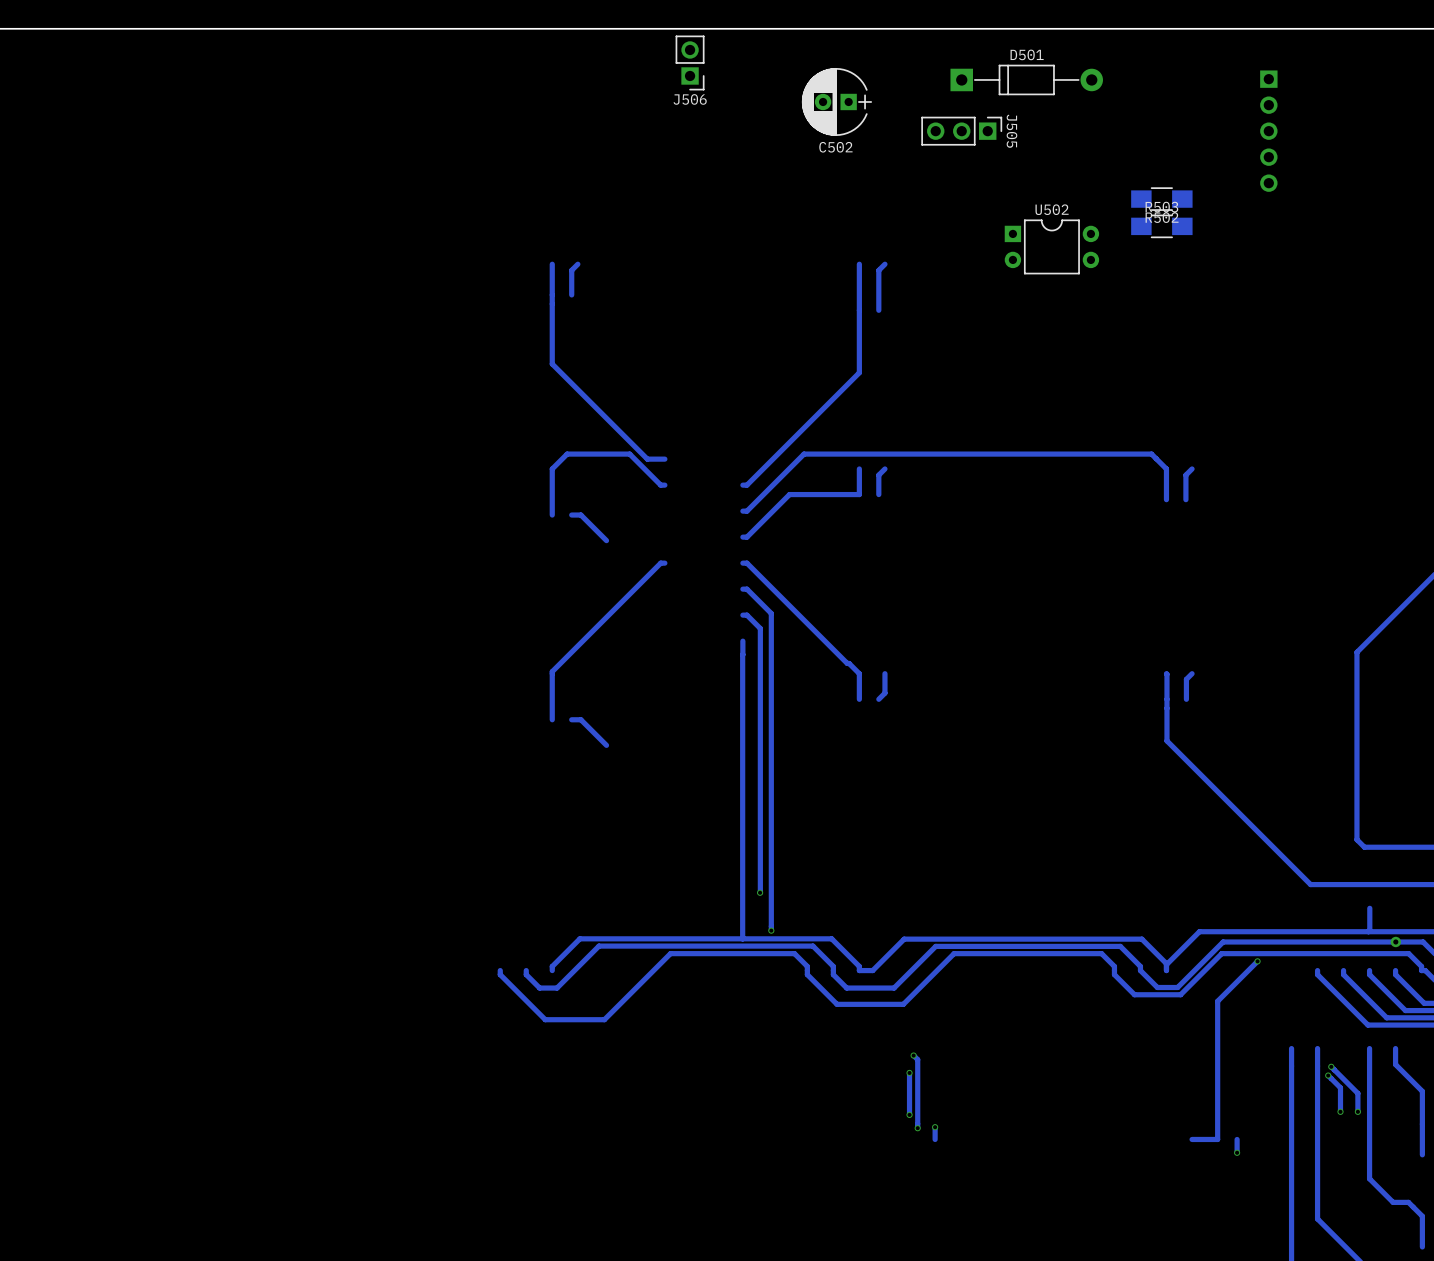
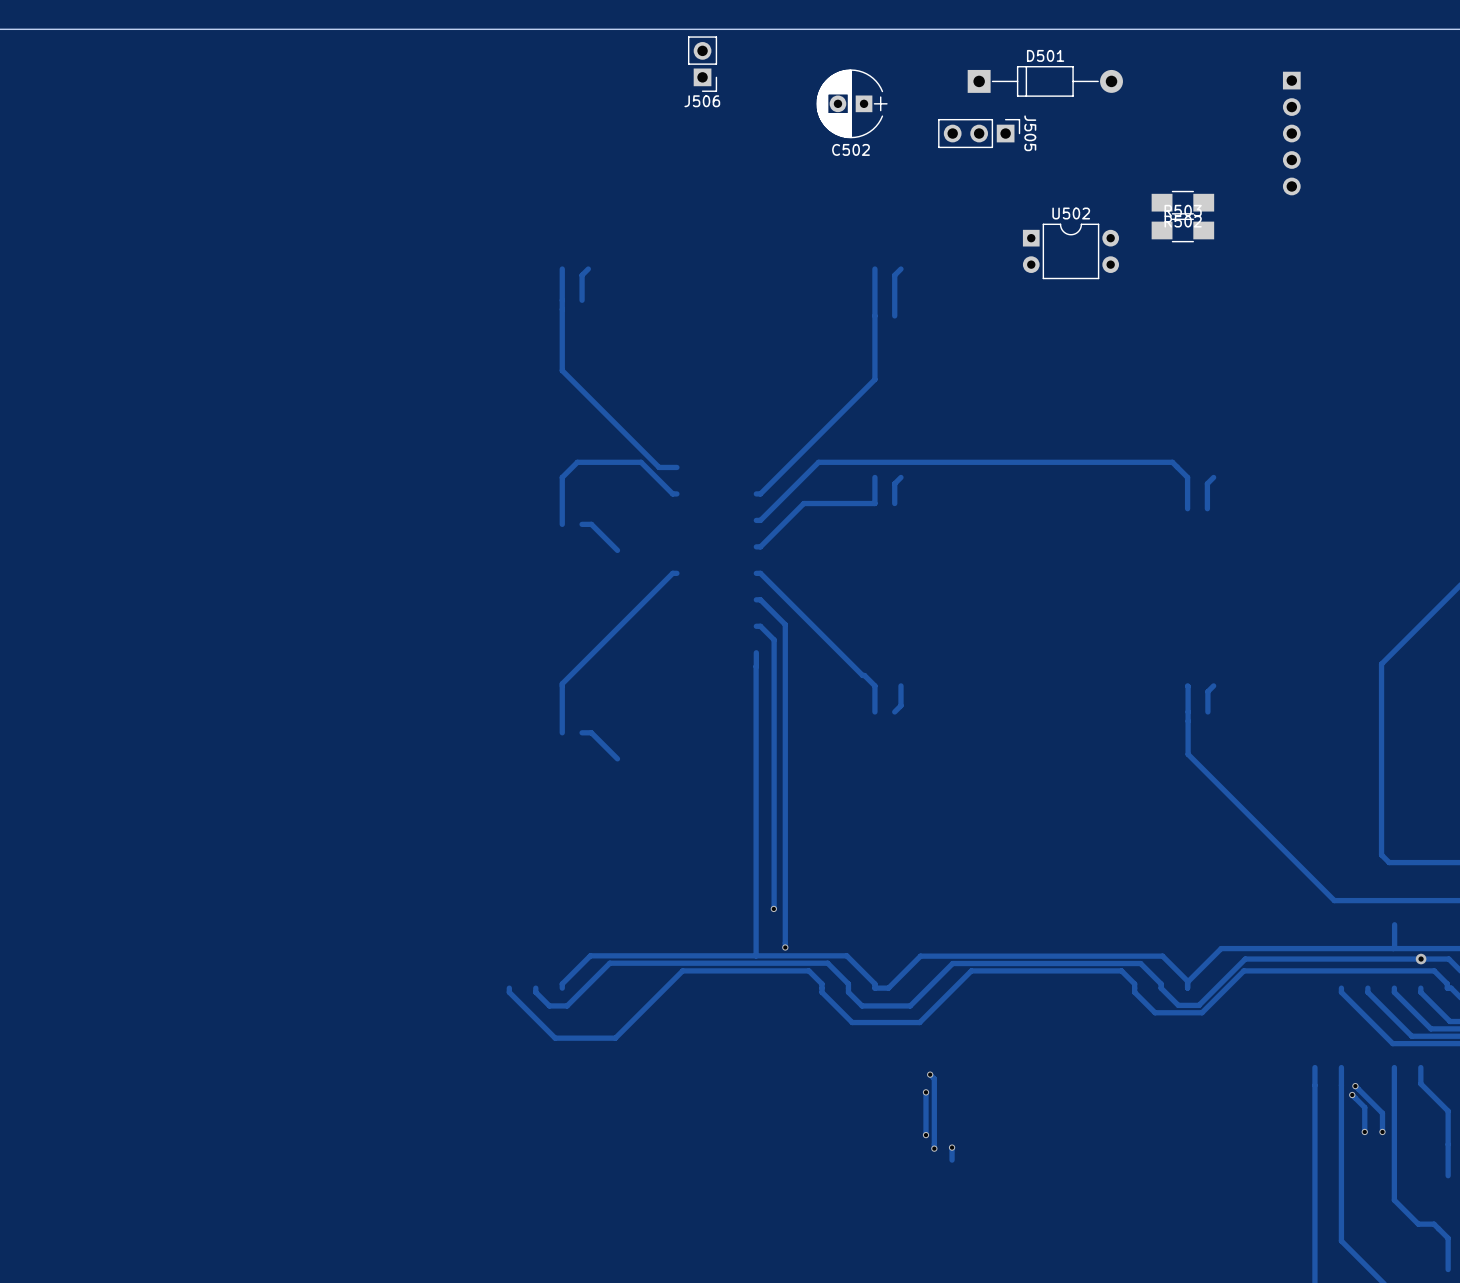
track: (1257, 961) (1217, 1001) (1217, 1139) (1192, 1139) -> none
via: (1257, 961) -> none
track: (1237, 1139) (1237, 1152) -> none
via: (1237, 1152) -> none

